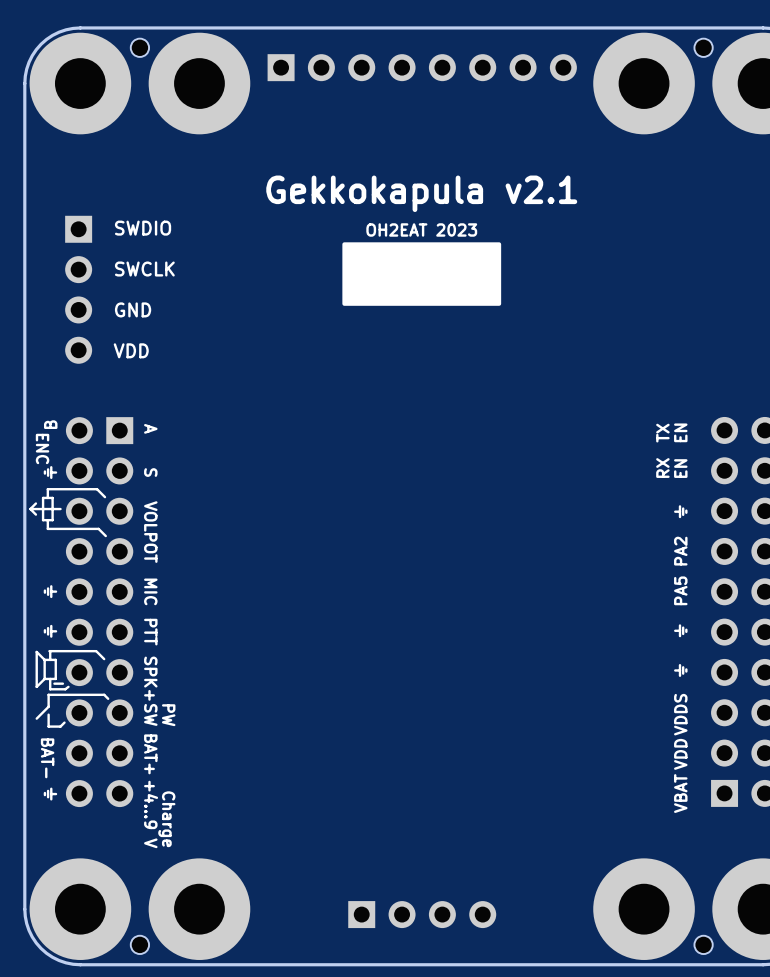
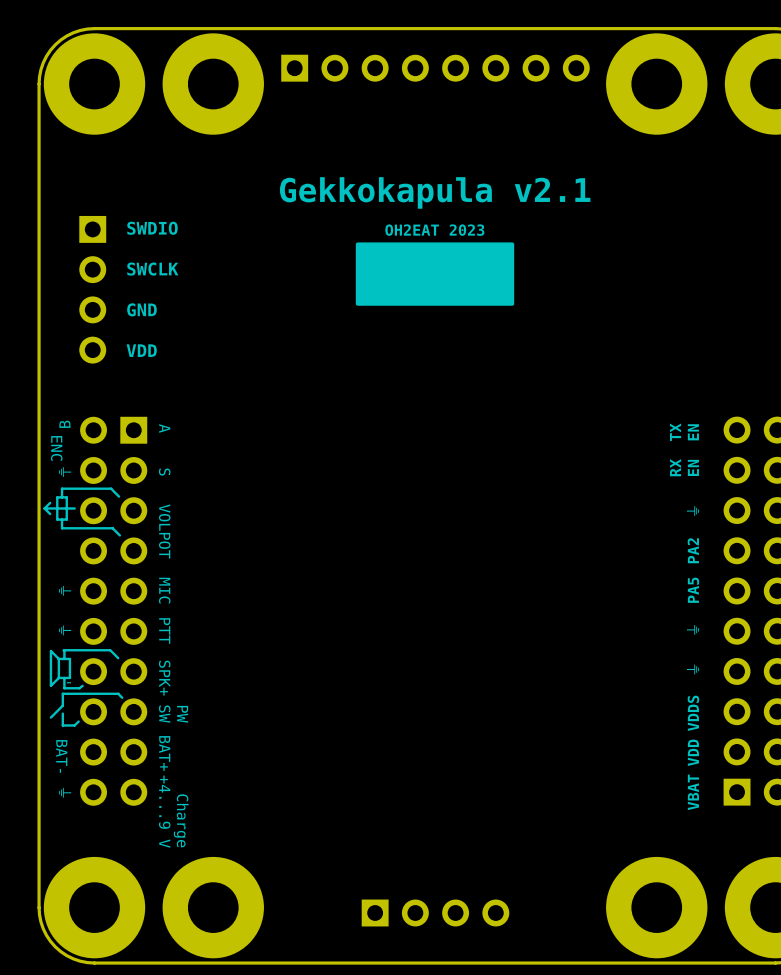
part: (139, 47) -> none
part: (703, 47) -> none
part: (139, 944) -> none
part: (703, 944) -> none

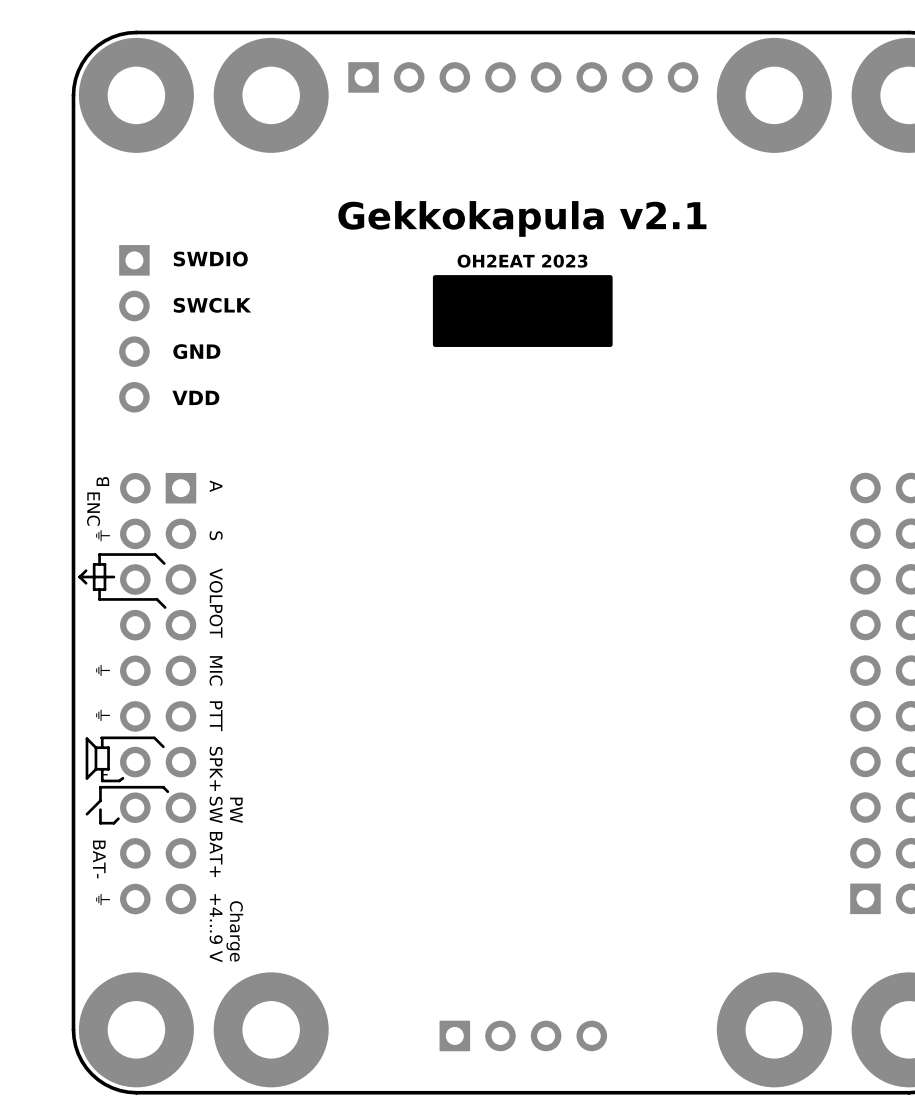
text: TX (675, 432) -> none
text: EN (693, 432) -> none
text: RX (675, 467) -> none
text: EN (693, 467) -> none
text: ⏚ (692, 511) -> none
text: PA2 (693, 550) -> none
text: PA5 (693, 590) -> none
text: ⏚ (692, 629) -> none
text: ⏚ (692, 669) -> none
text: VDDS (693, 713) -> none
text: VDD (693, 752) -> none
text: VBAT (693, 792) -> none

